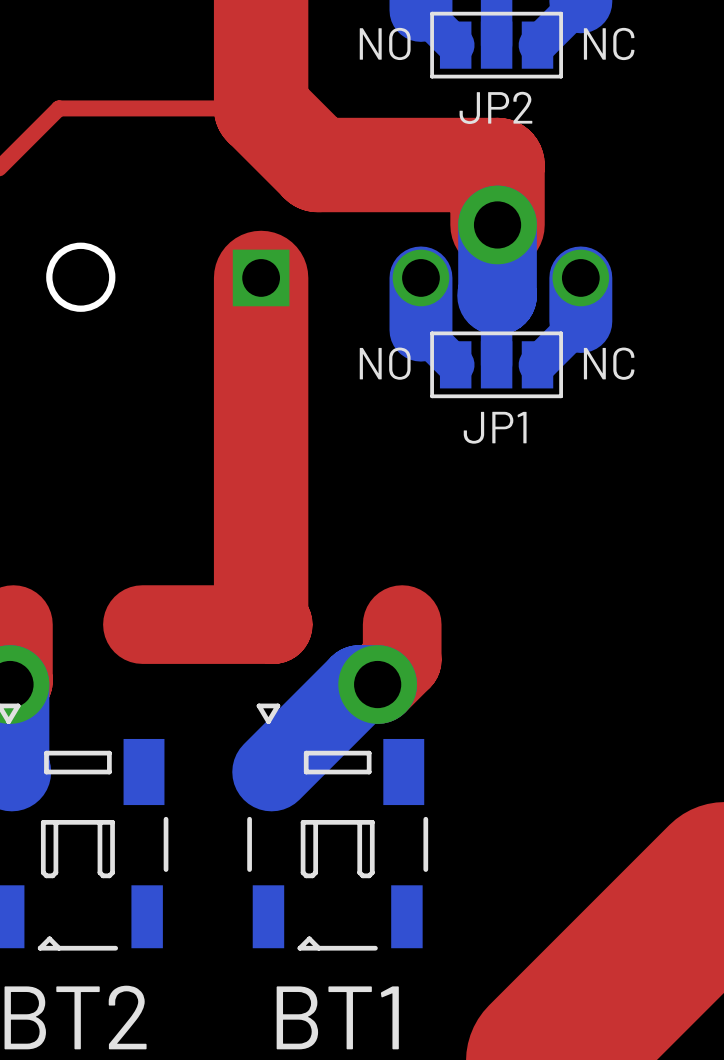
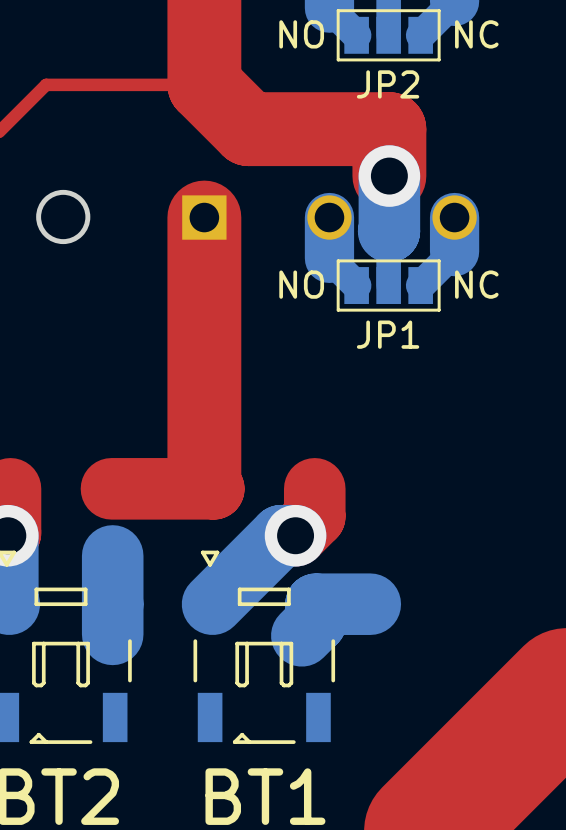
bottom track: none -> (112, 555) (112, 634)
bottom track: none -> (370, 604) (316, 604) (316, 621) (301, 635)

